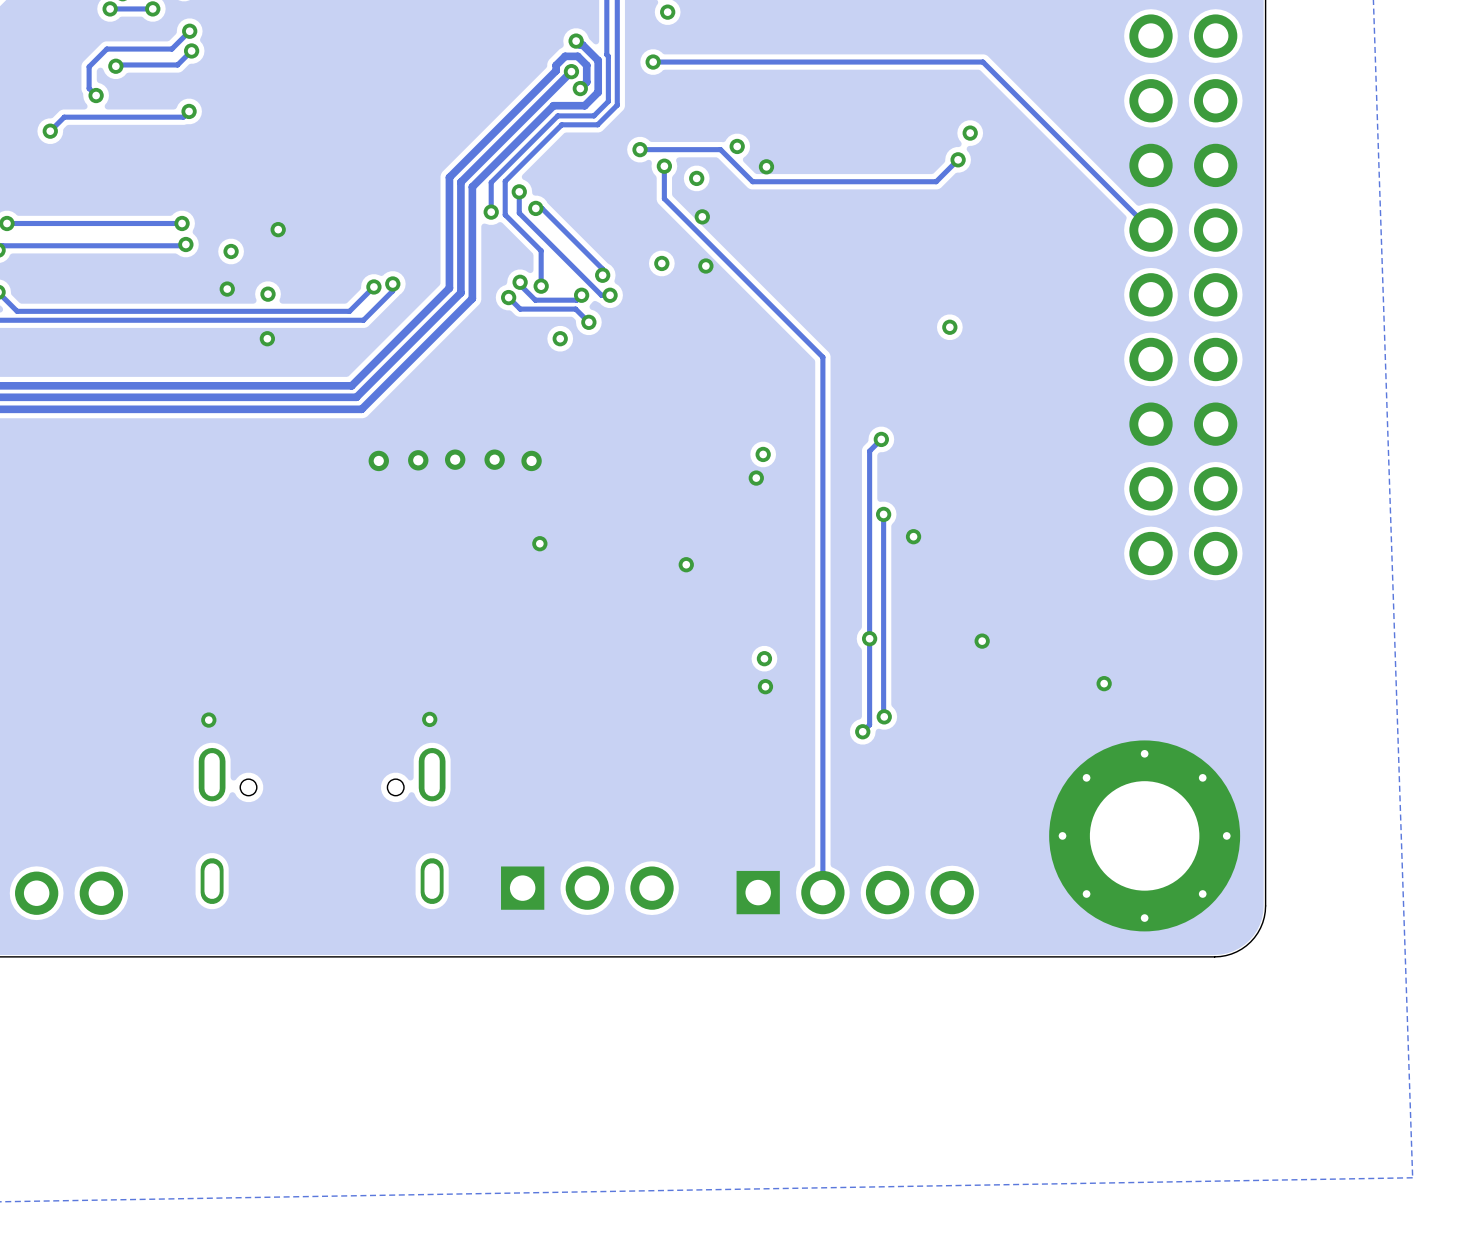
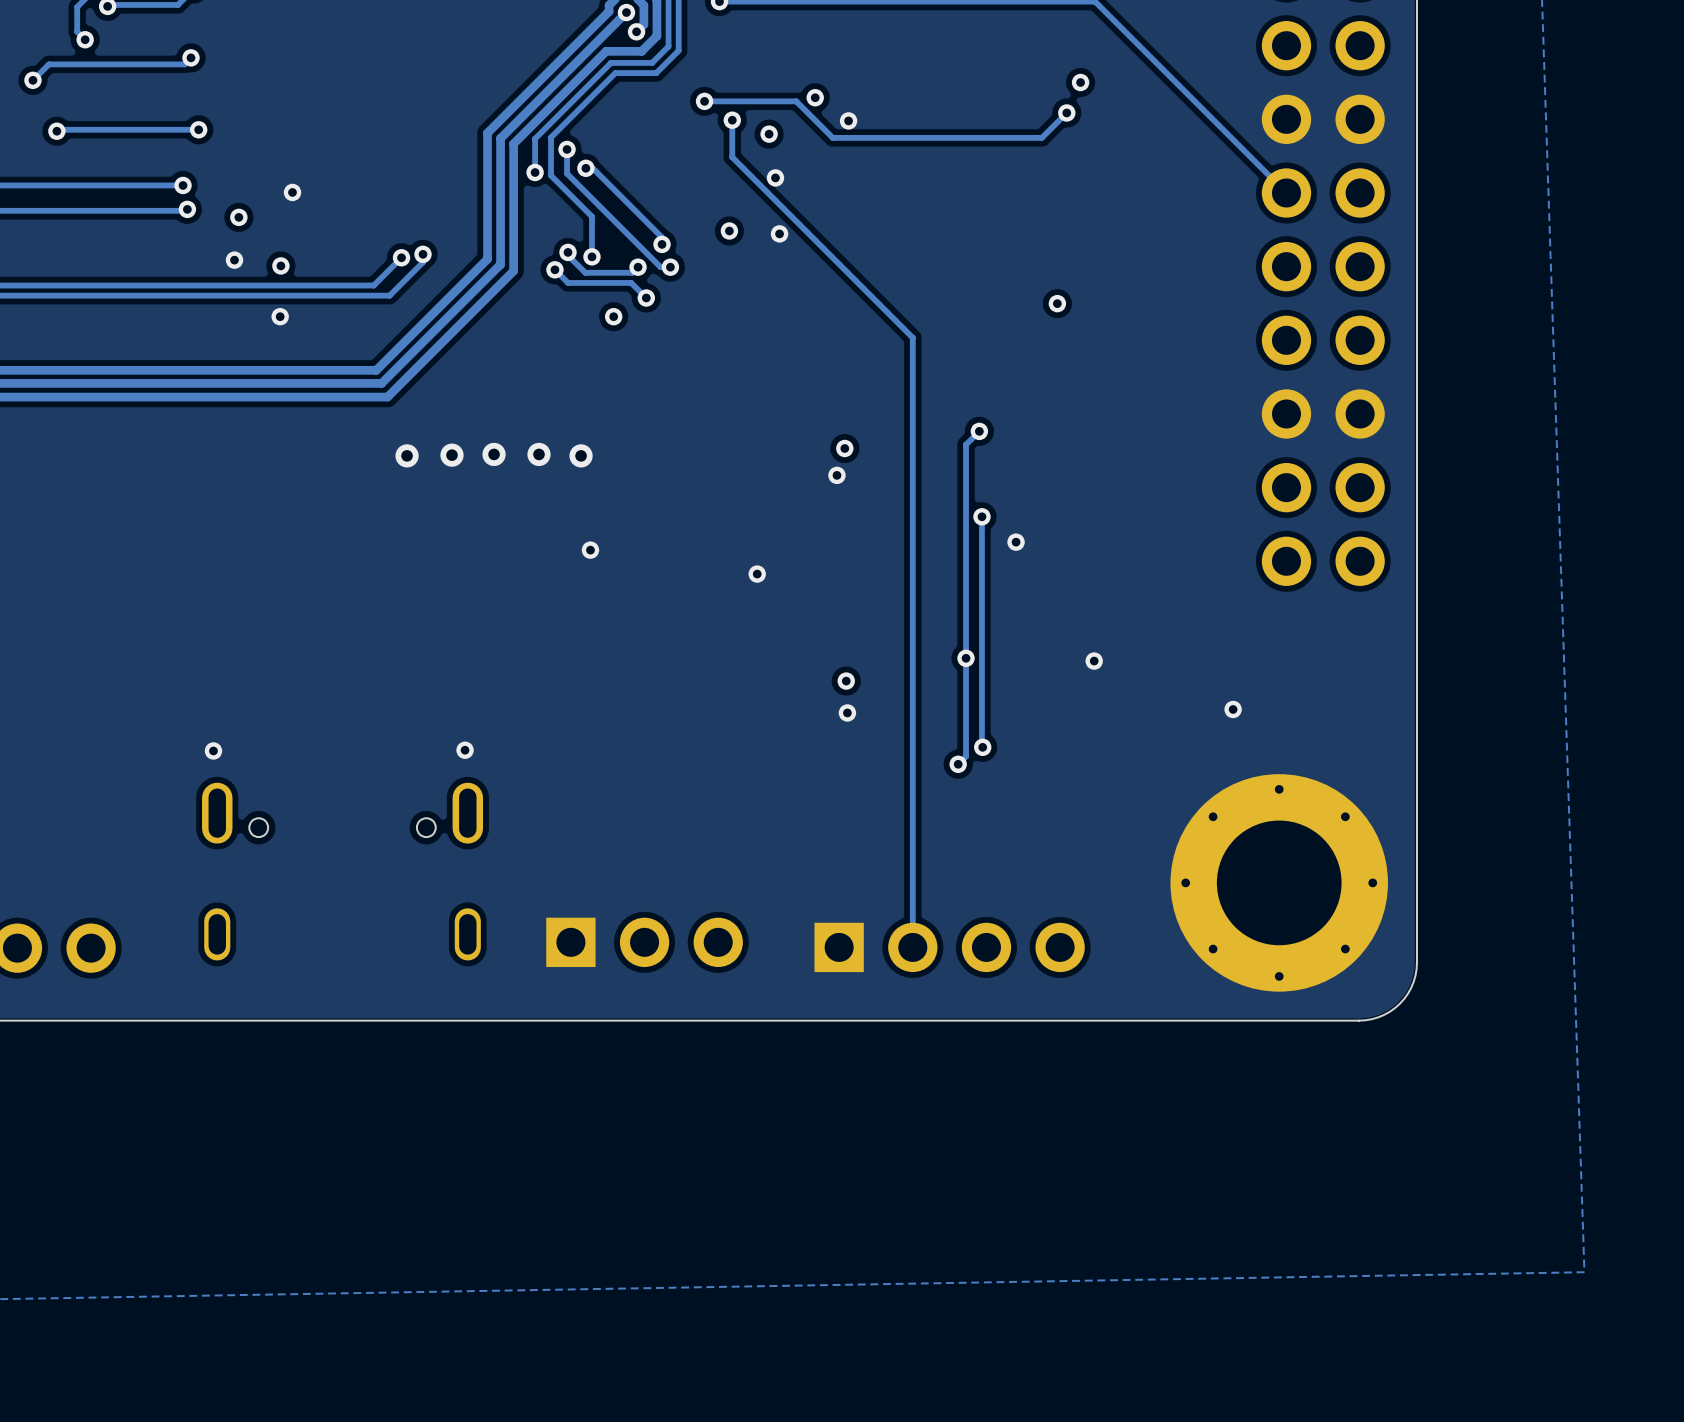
track: none -> (198, 129) (56, 131)
via: none -> (198, 129)
via: none -> (56, 131)

